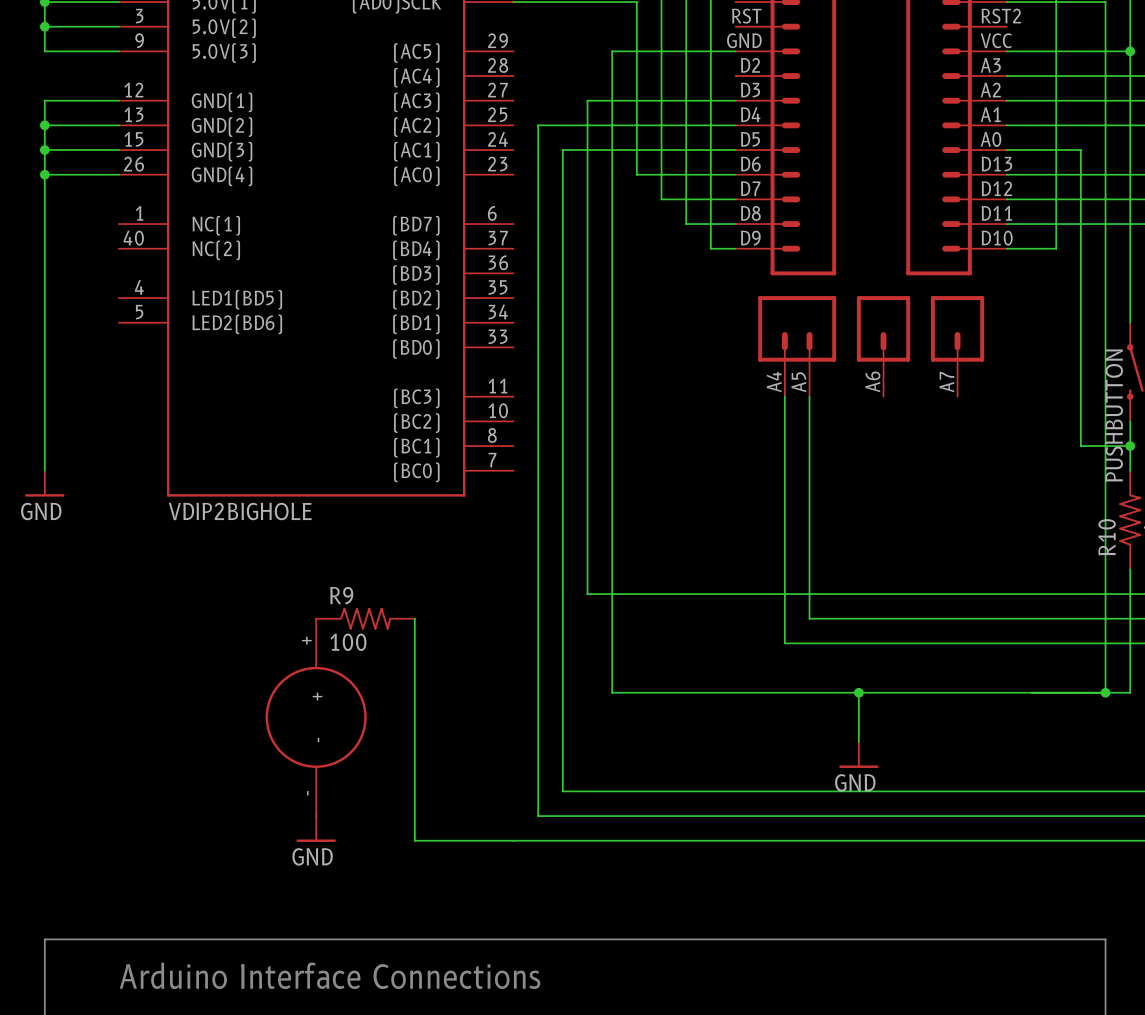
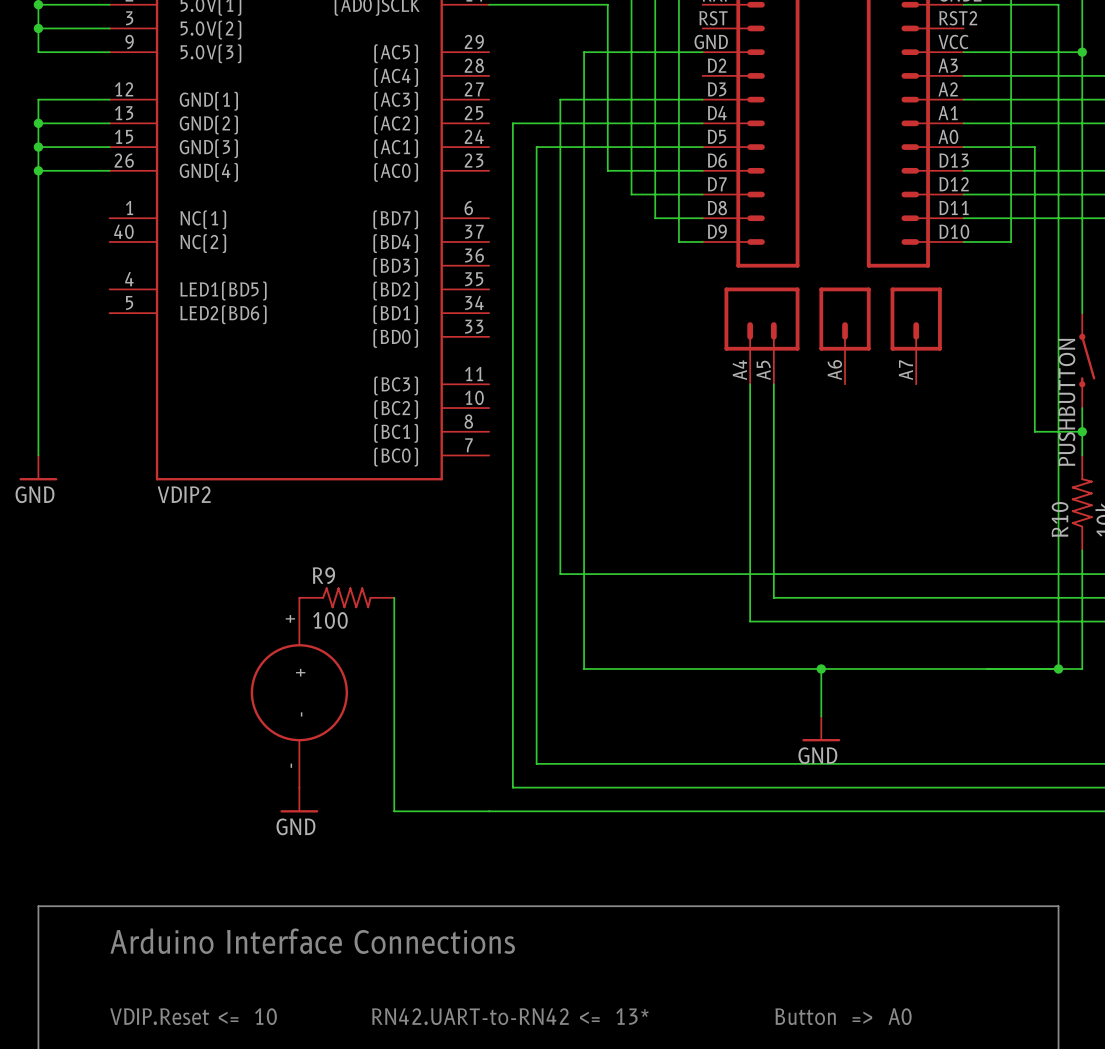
part value: VDIP2BIGHOLE (240, 511) -> VDIP2 (184, 494)

